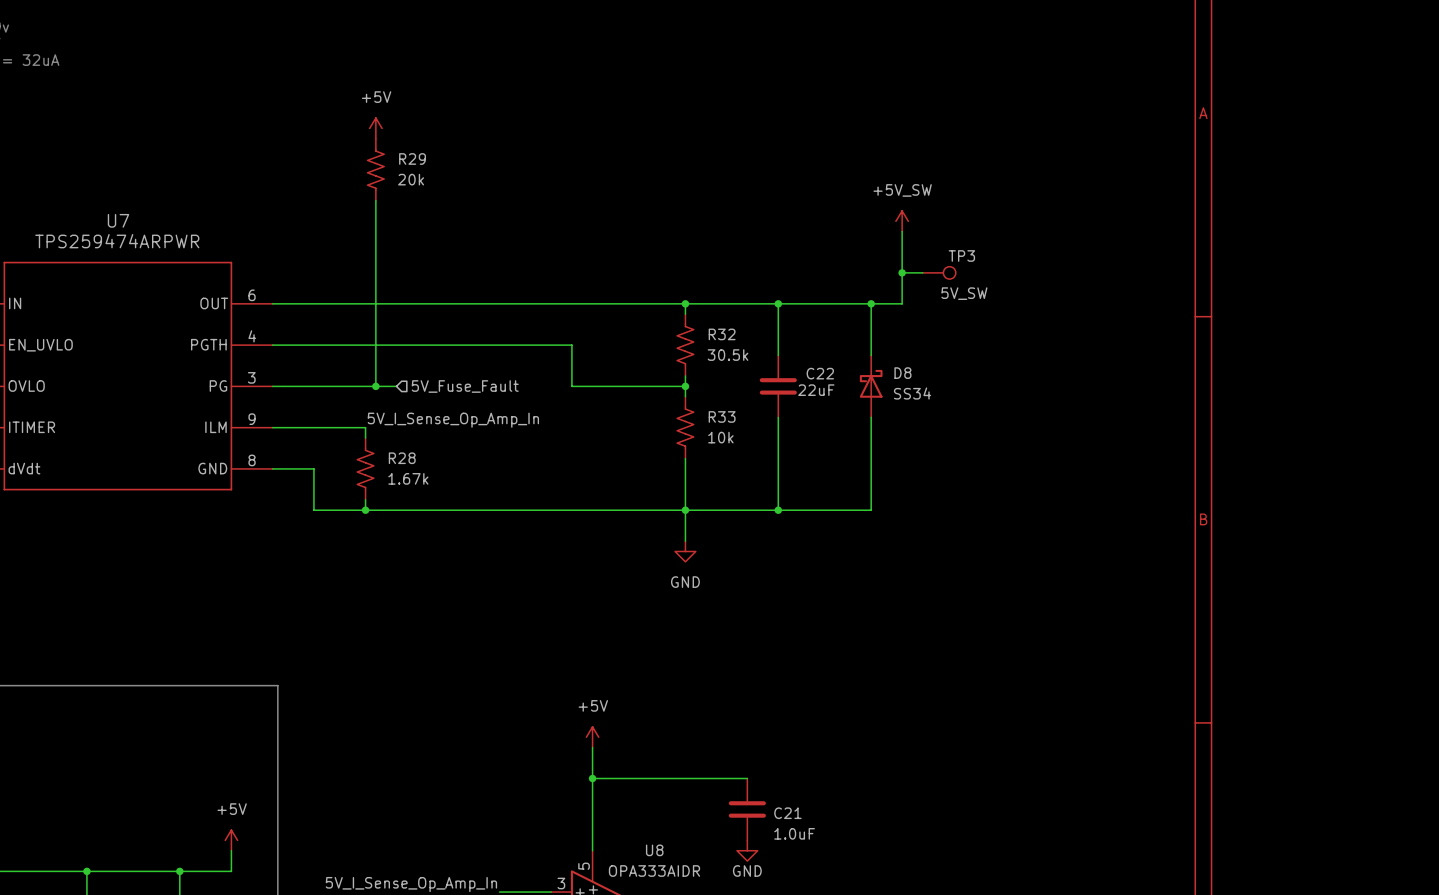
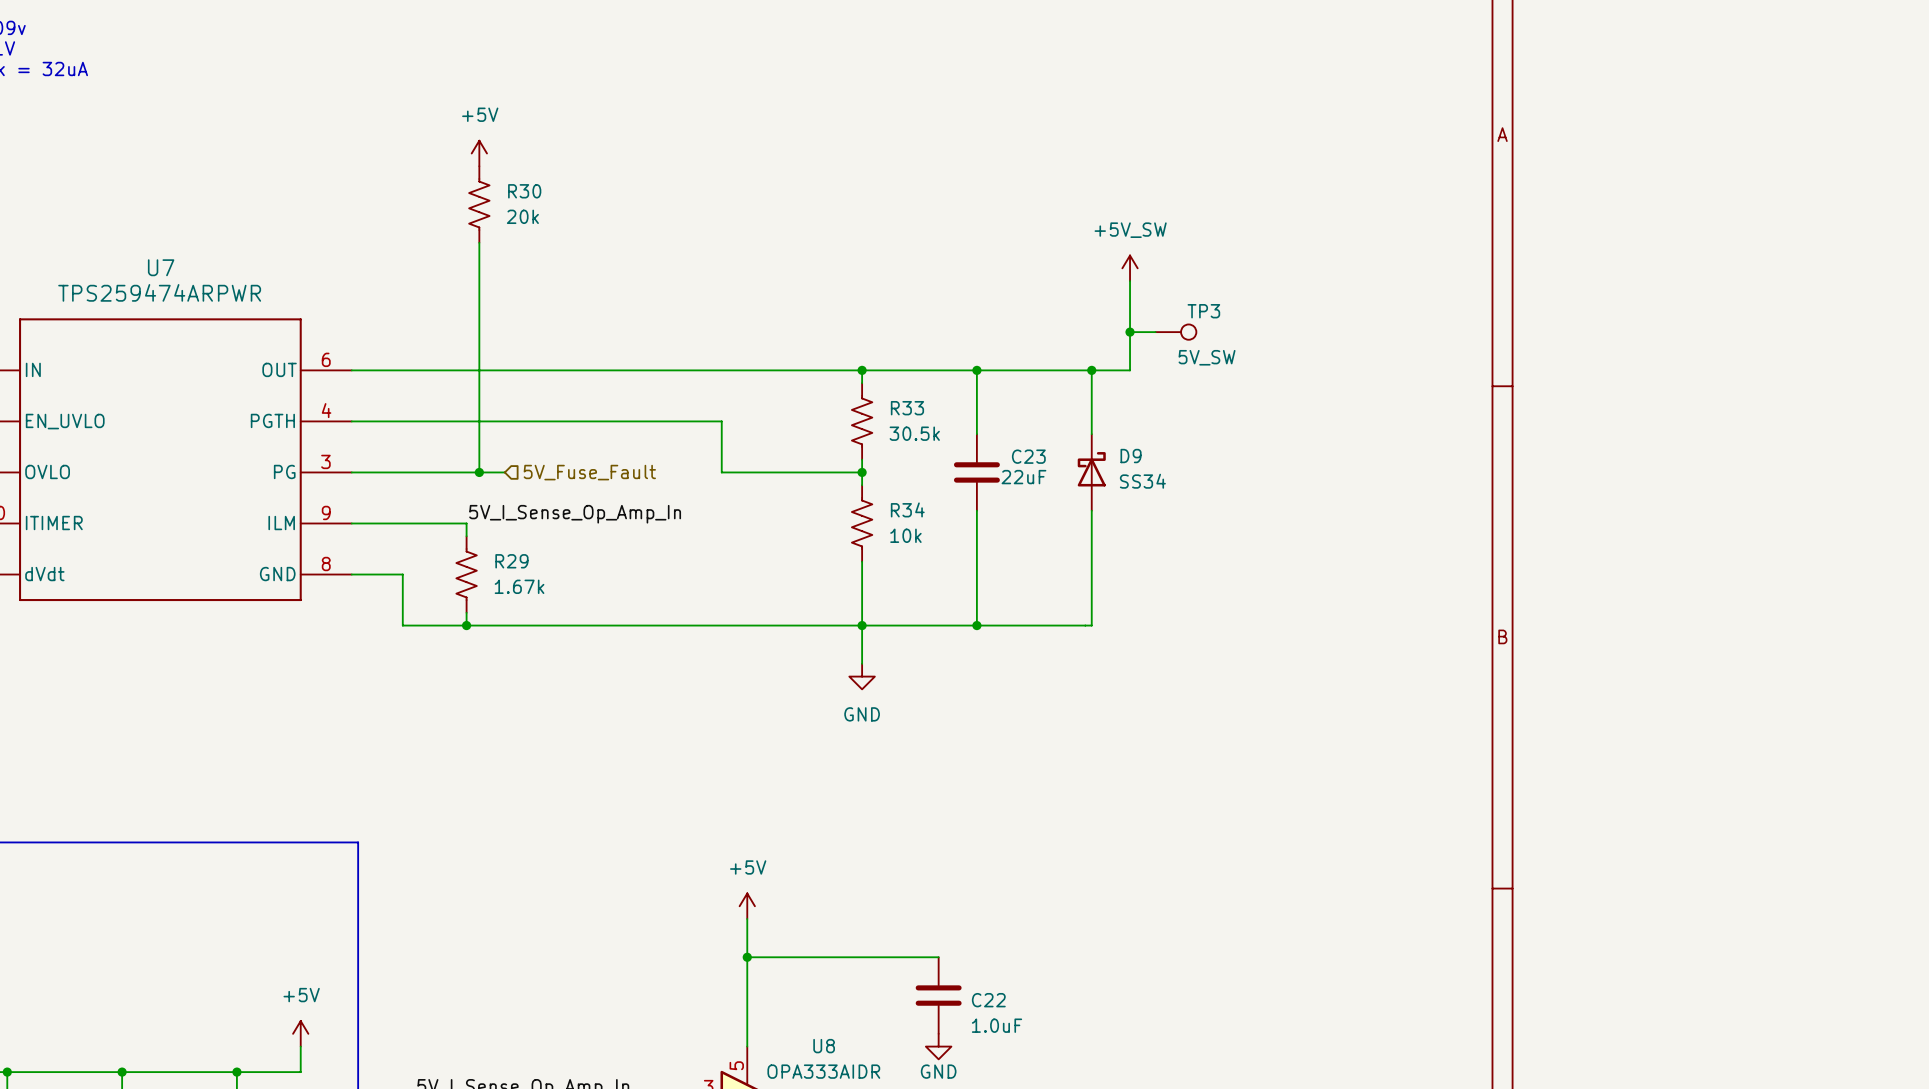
R29 name: R29 (412, 158) -> R30 (524, 191)
R32 name: R32 (722, 334) -> R33 (907, 408)
C22 name: C22 (820, 373) -> C23 (1028, 456)
D8 name: D8 (902, 373) -> D9 (1131, 456)
R33 name: R33 (722, 416) -> R34 (907, 509)
R28 name: R28 (402, 458) -> R29 (511, 561)
C21 name: C21 (787, 813) -> C22 (988, 1000)

